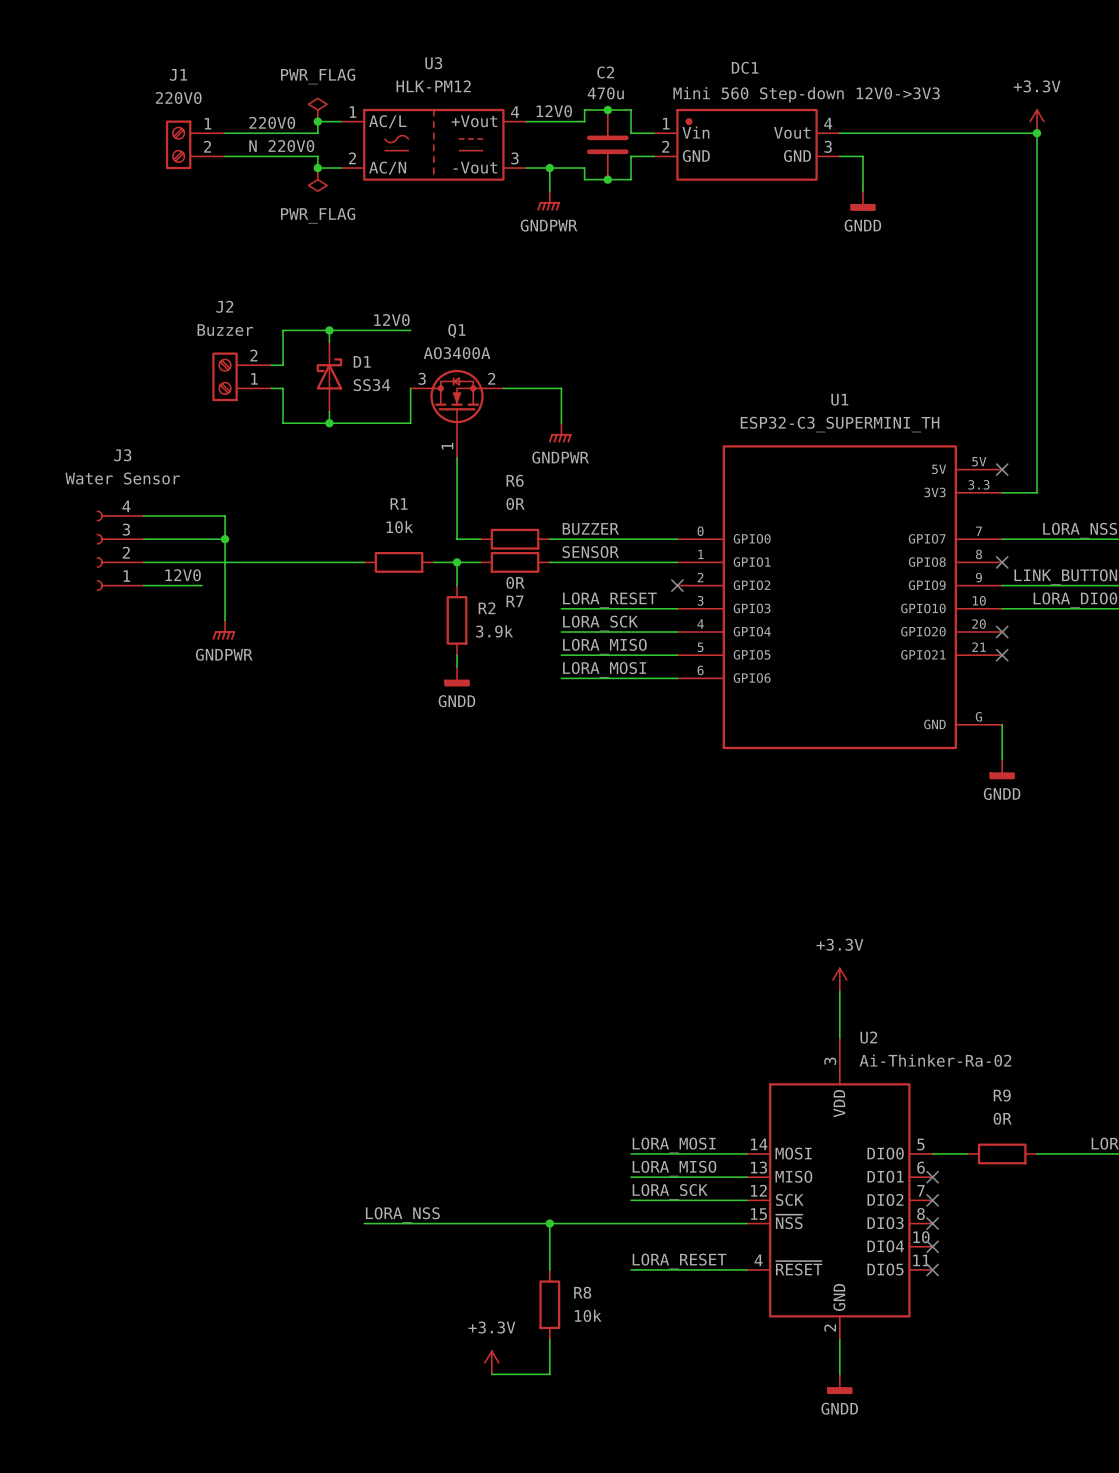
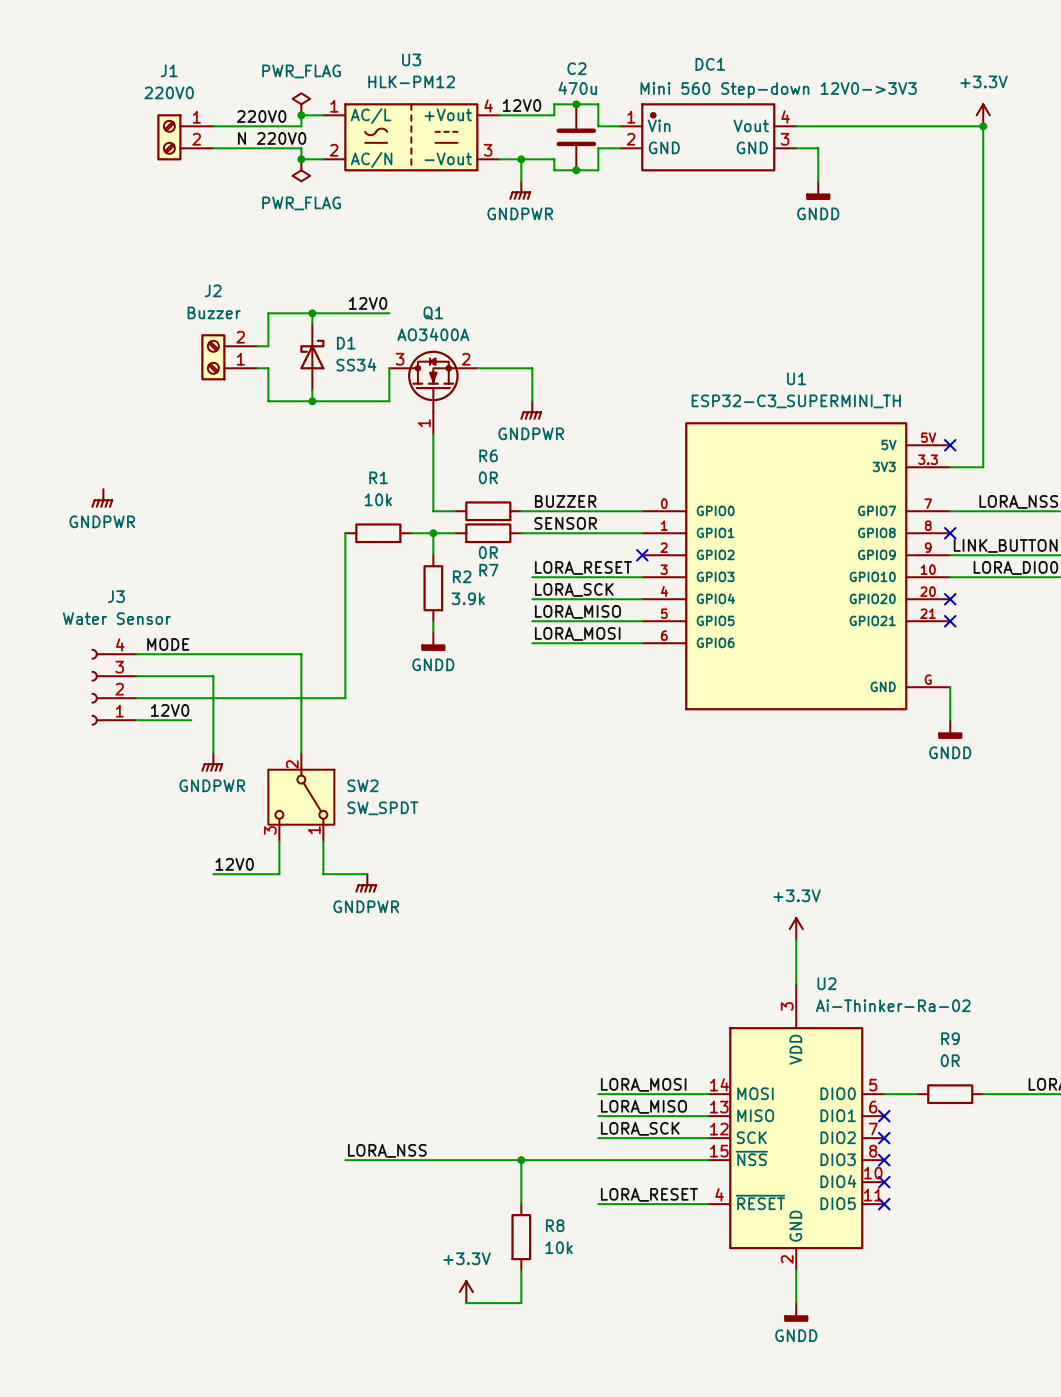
wire: (143, 516) (225, 516) (225, 620) -> none
power symbol: none -> GNDPWR (102, 498)
wire: (143, 539) (225, 539) -> none
junction: (225, 539) -> none
J3 position: (120, 550) -> (114, 687)
wire: (143, 562) (364, 562) -> (136, 698) (345, 698) (345, 533)
label: 12V0 (183, 575) -> none
wire: (143, 585) (201, 585) -> (136, 720) (191, 720)
power symbol: GNDPWR (223, 630) -> none
label: none -> MODE (168, 644)
wire: none -> (136, 654) (301, 654) (301, 753)
wire: none -> (136, 676) (213, 676) (213, 753)
label: none -> 12V0 (170, 710)
power symbol: none -> GNDPWR (212, 762)
SW2: none -> SW_SPDT (301, 797)
wire: none -> (279, 841) (279, 874) (213, 874)
wire: none -> (323, 841) (323, 874) (367, 874)
label: none -> 12V0 (234, 864)
power symbol: none -> GNDPWR (366, 883)

